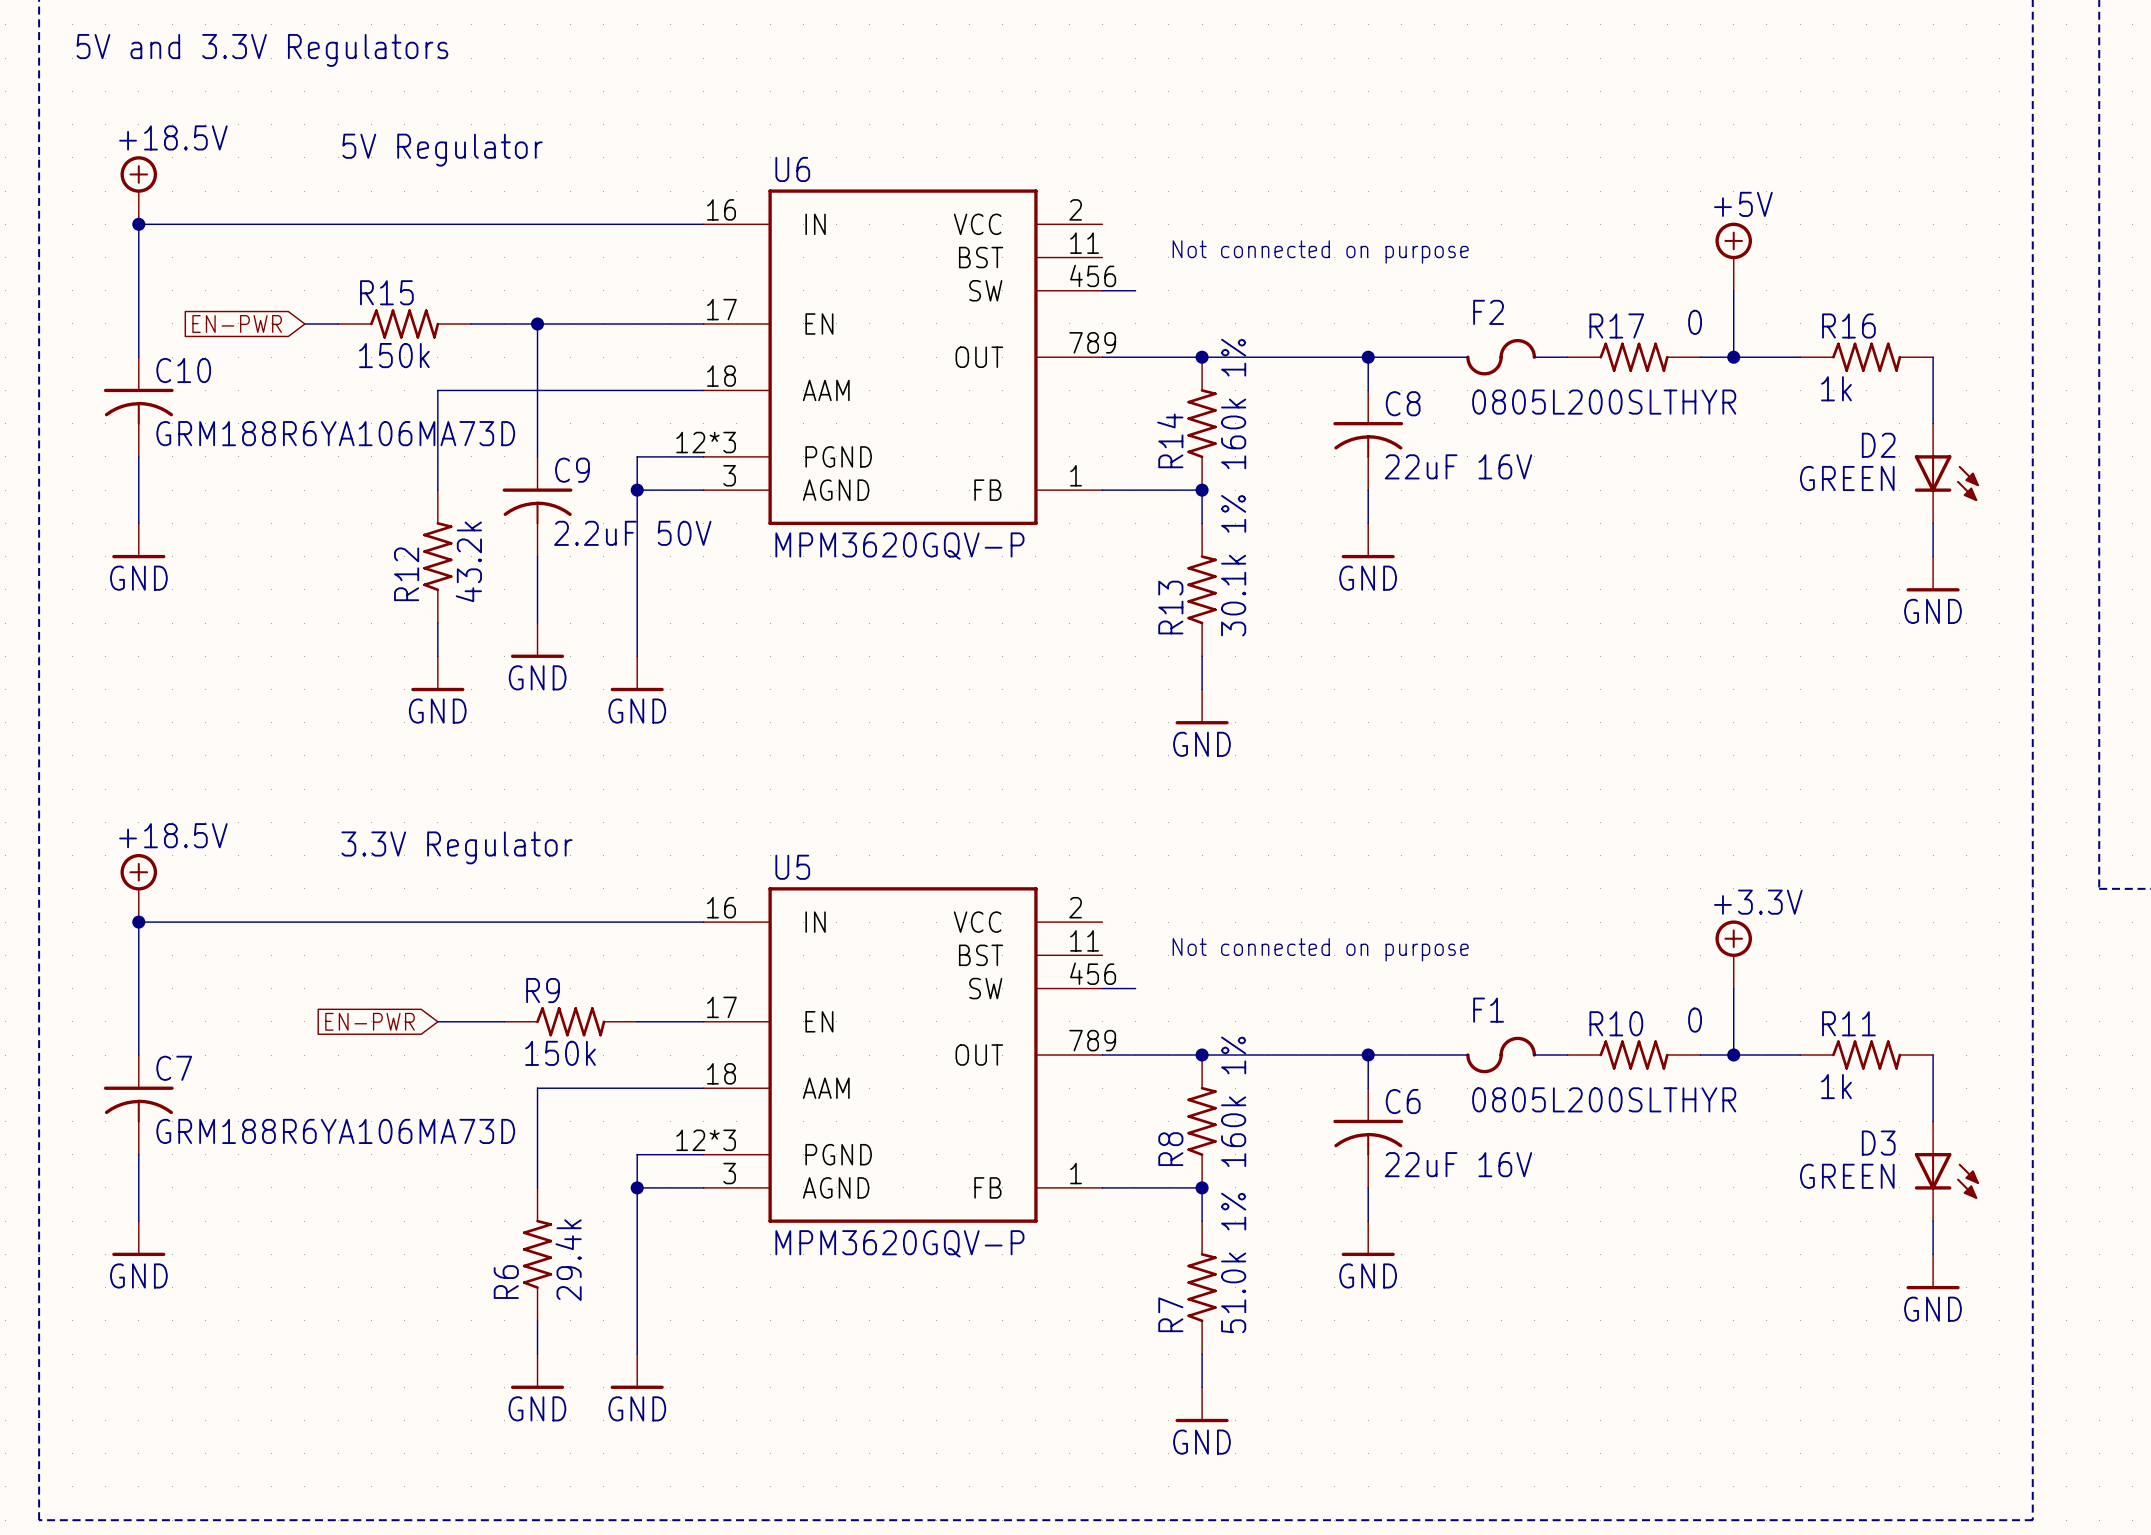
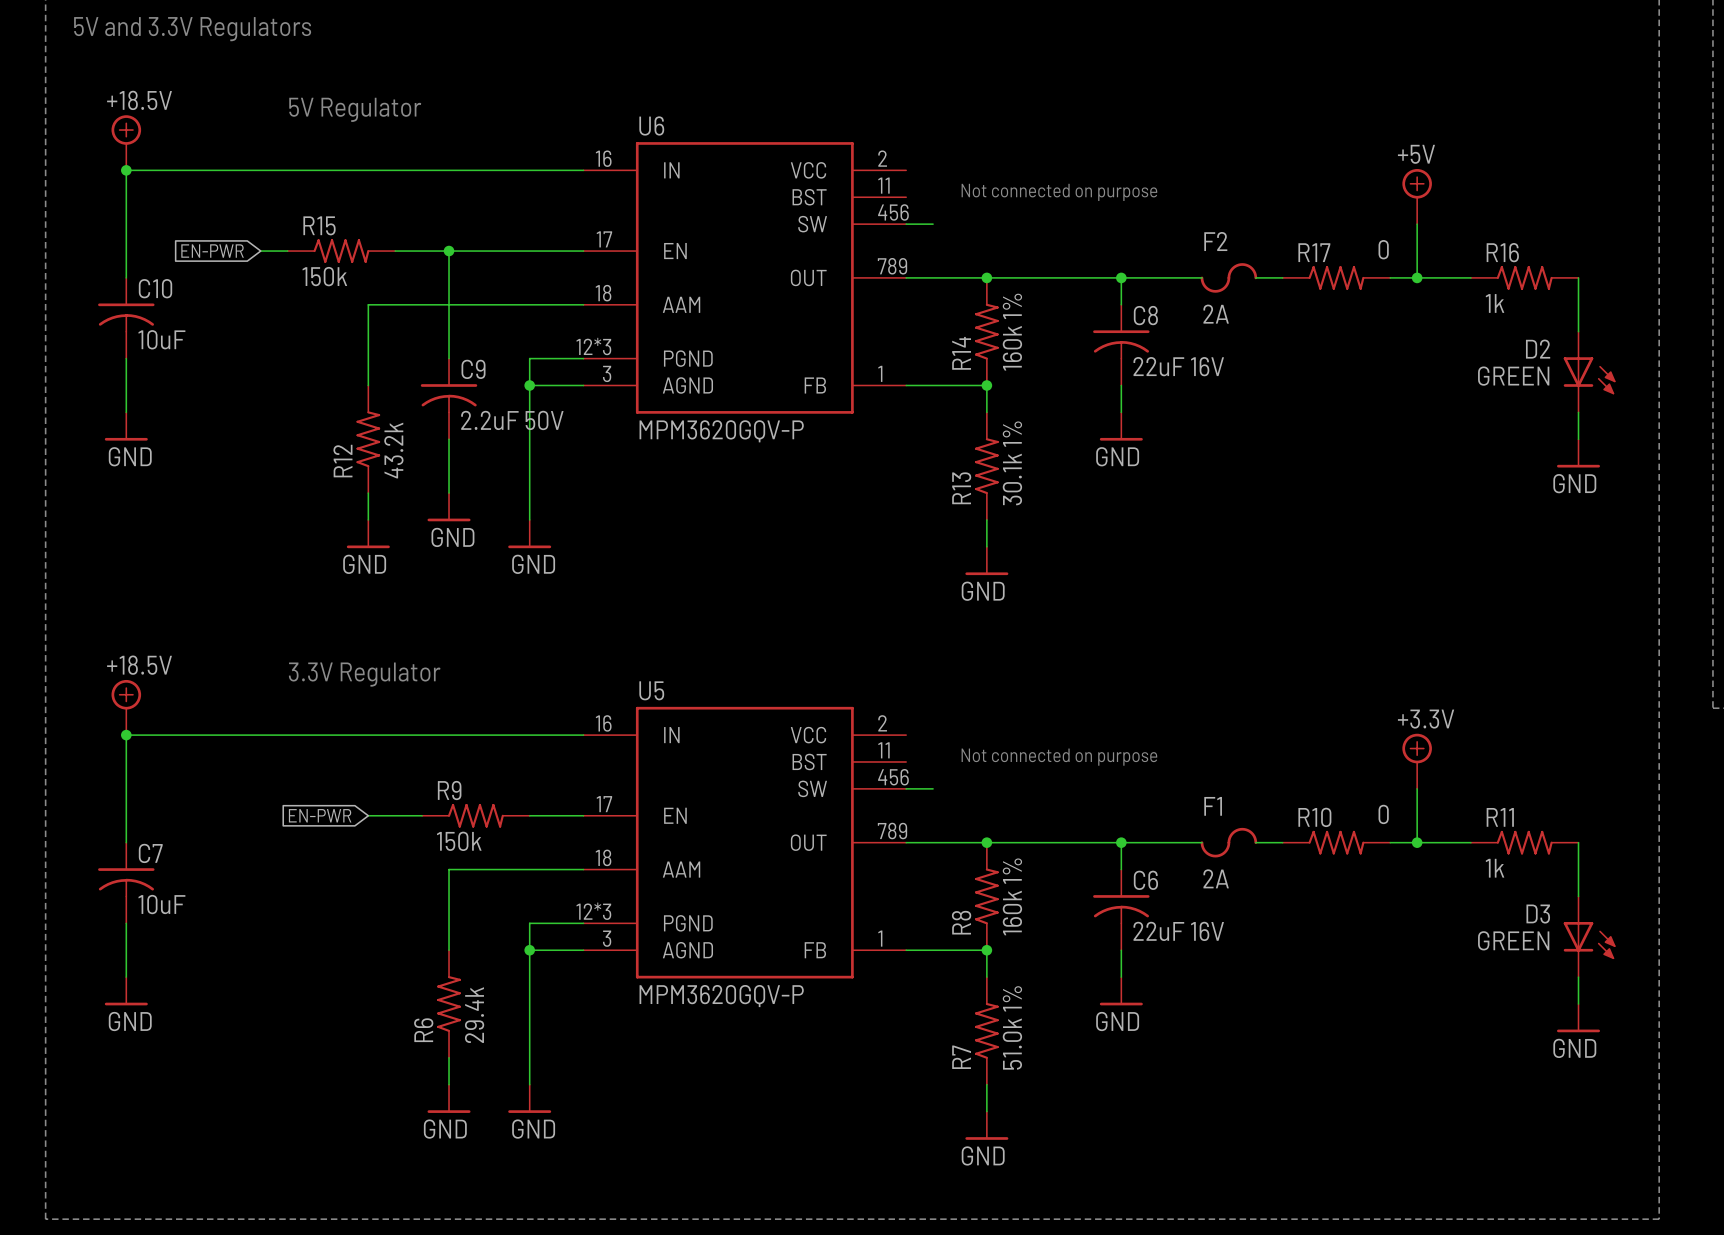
F2 value: 0805L200SLTHYR (1604, 402) -> 2A (1216, 314)
C10 value: GRM188R6YA106MA73D (335, 433) -> 10uF (161, 339)
F1 value: 0805L200SLTHYR (1604, 1099) -> 2A (1216, 878)
C7 value: GRM188R6YA106MA73D (335, 1131) -> 10uF (161, 904)

